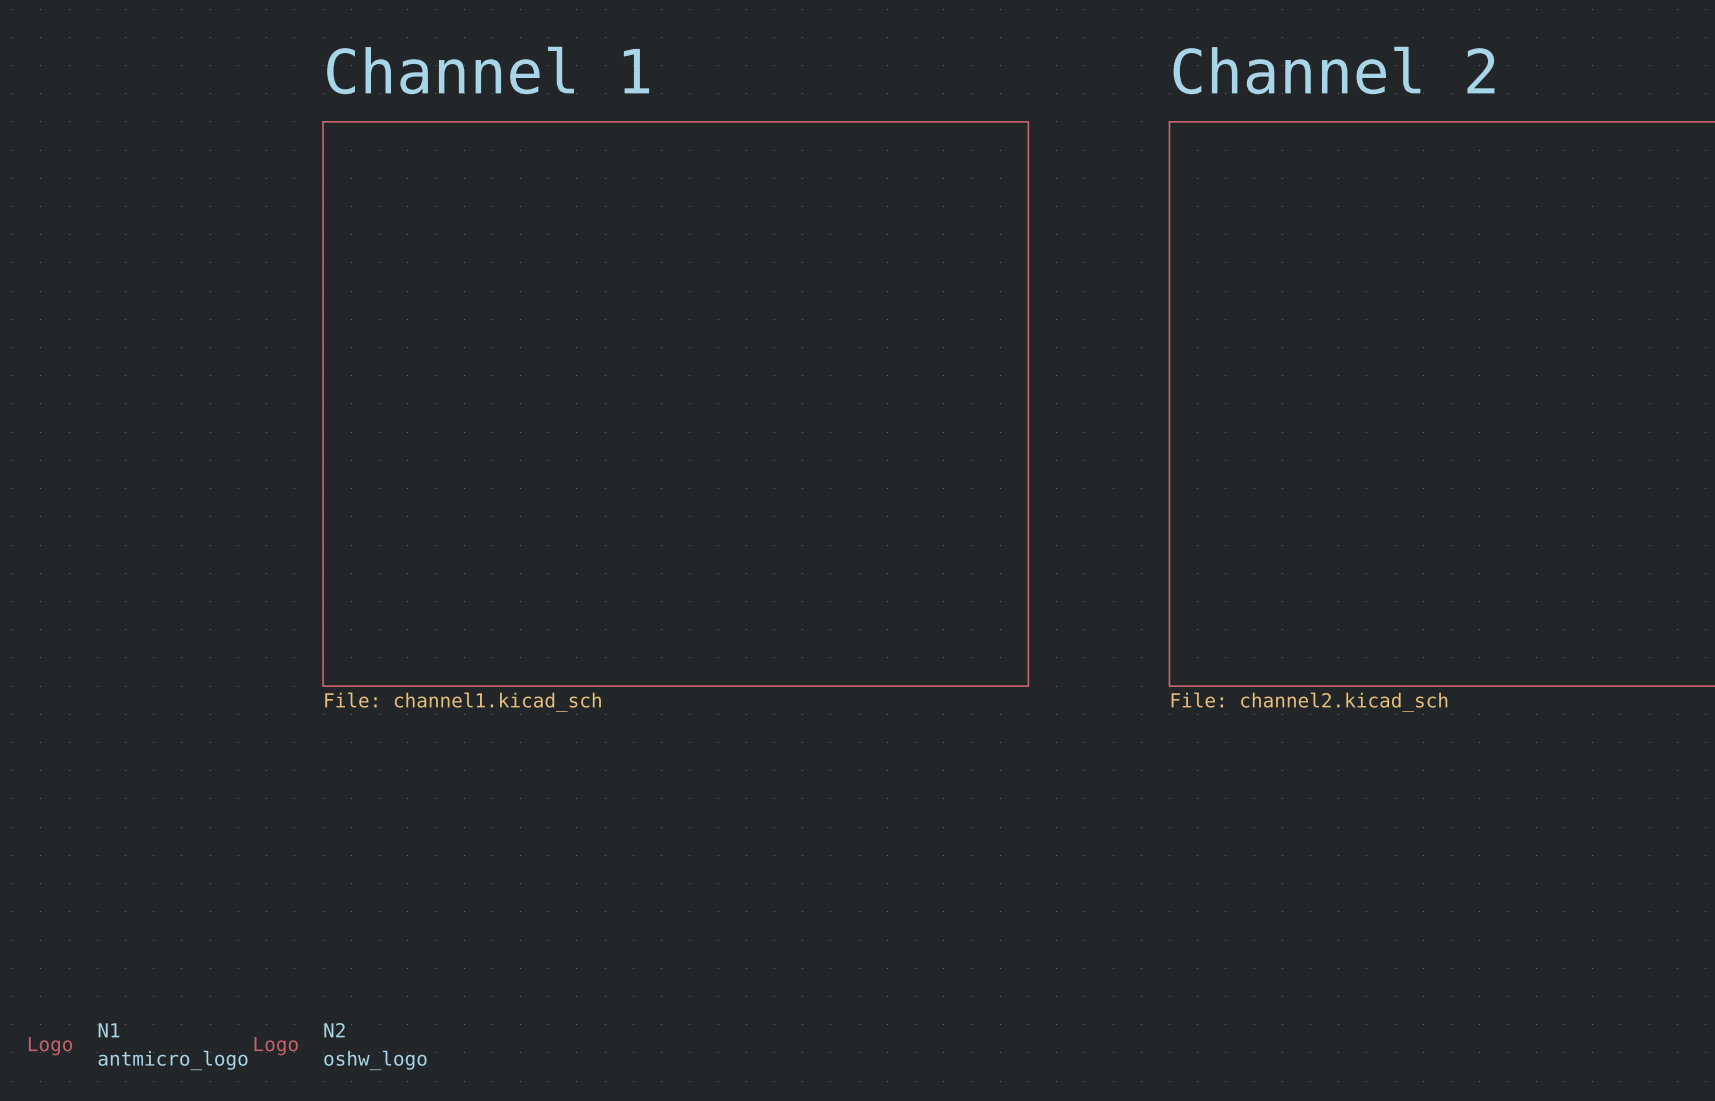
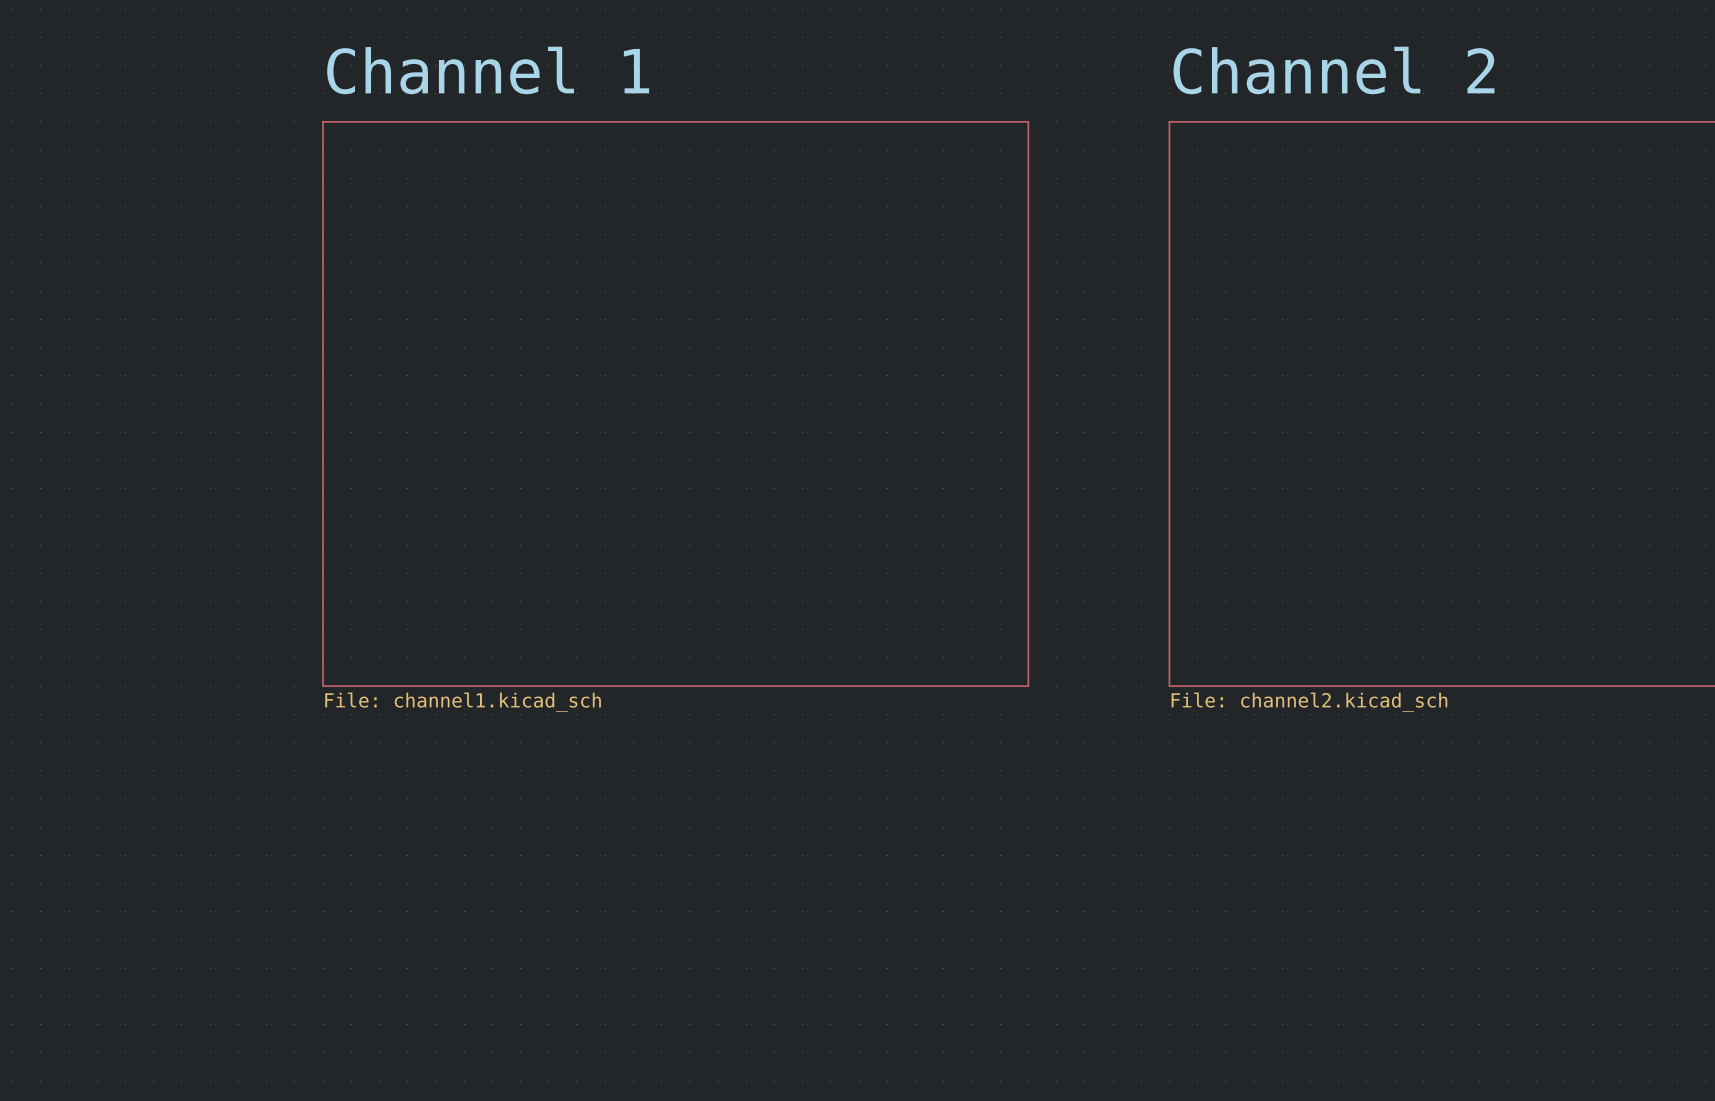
N1: antmicro_logo (138, 1046) -> none
N2: oshw_logo (340, 1046) -> none

